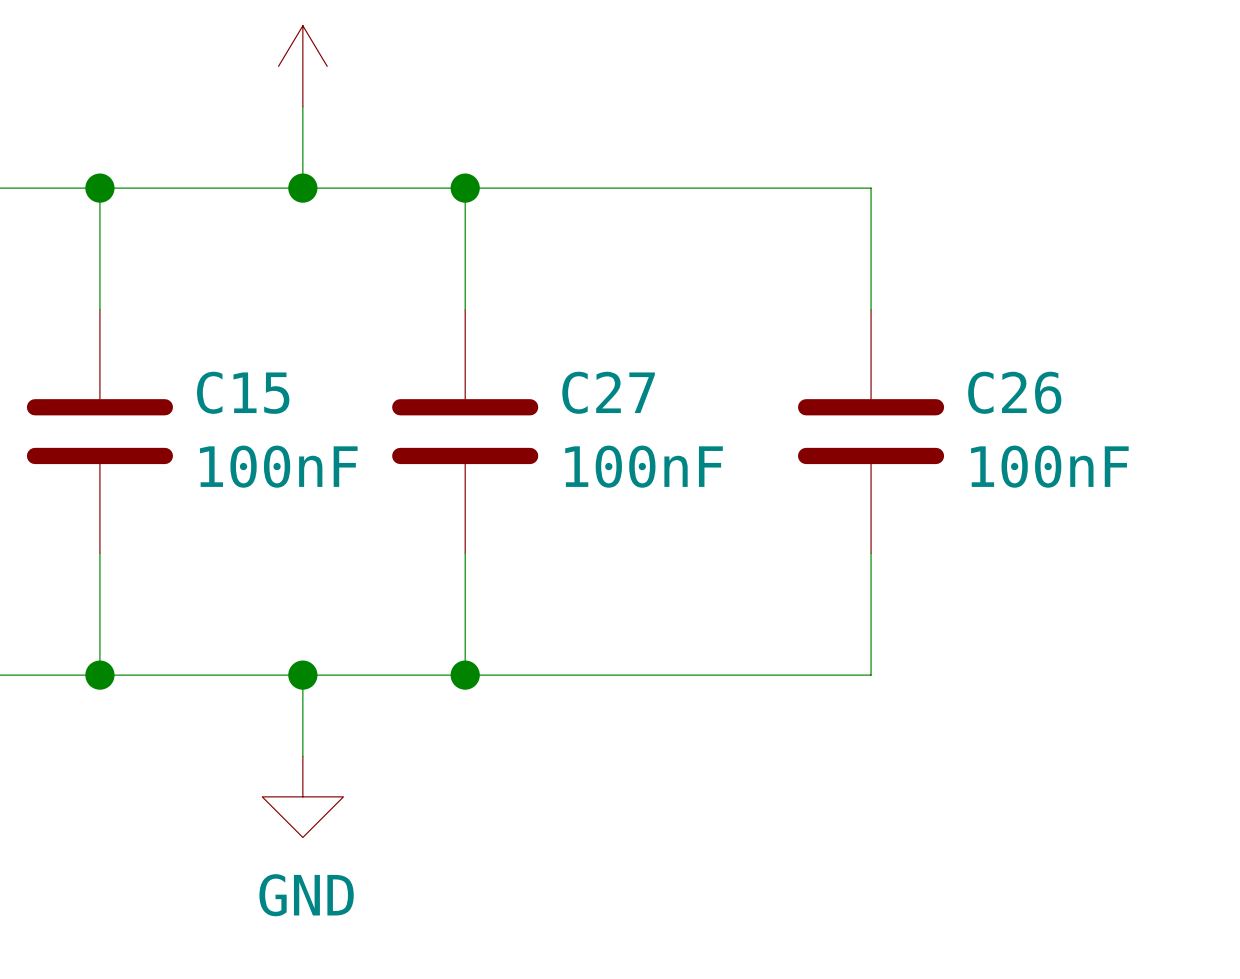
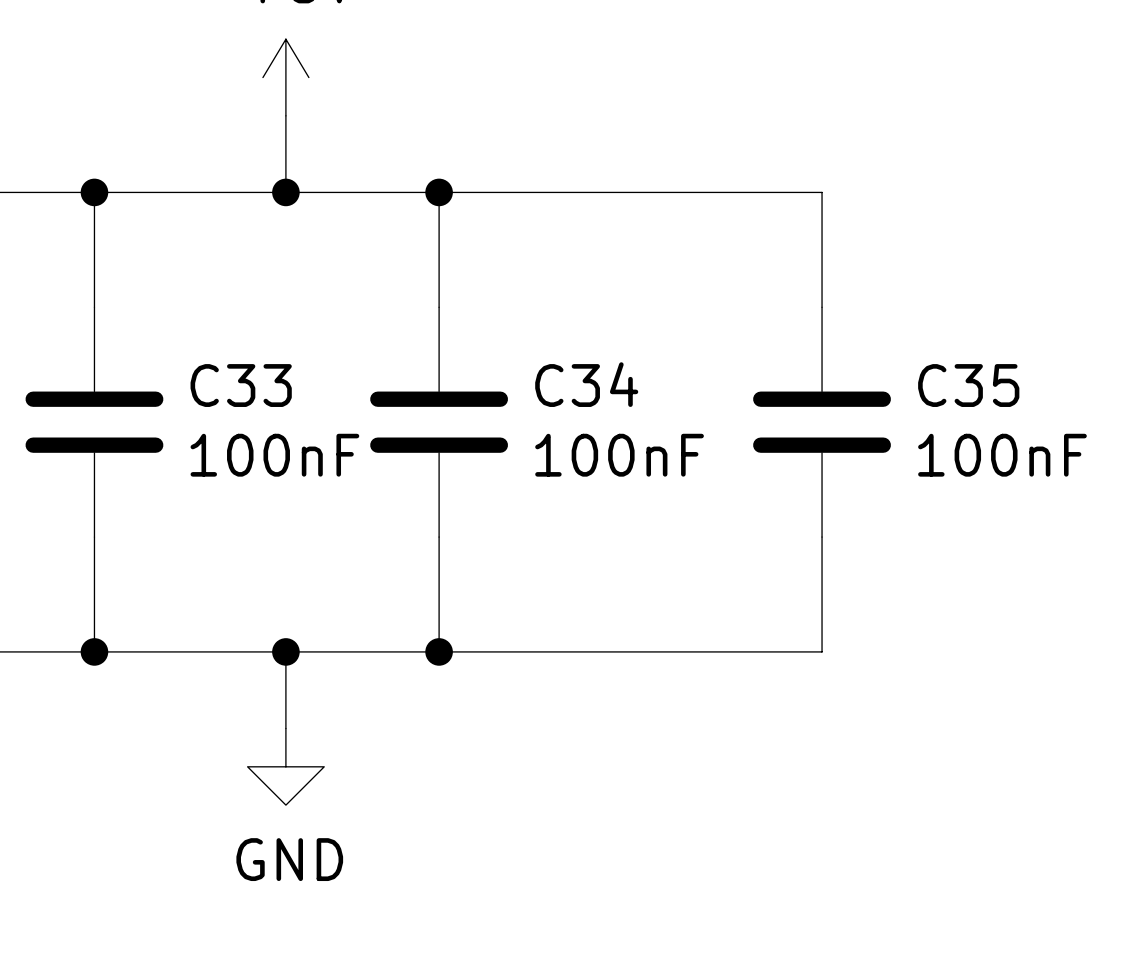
C15 name: C15 (243, 392) -> C33 (241, 385)
C27 name: C27 (608, 392) -> C34 (586, 384)
C26 name: C26 (1014, 392) -> C35 (968, 385)

